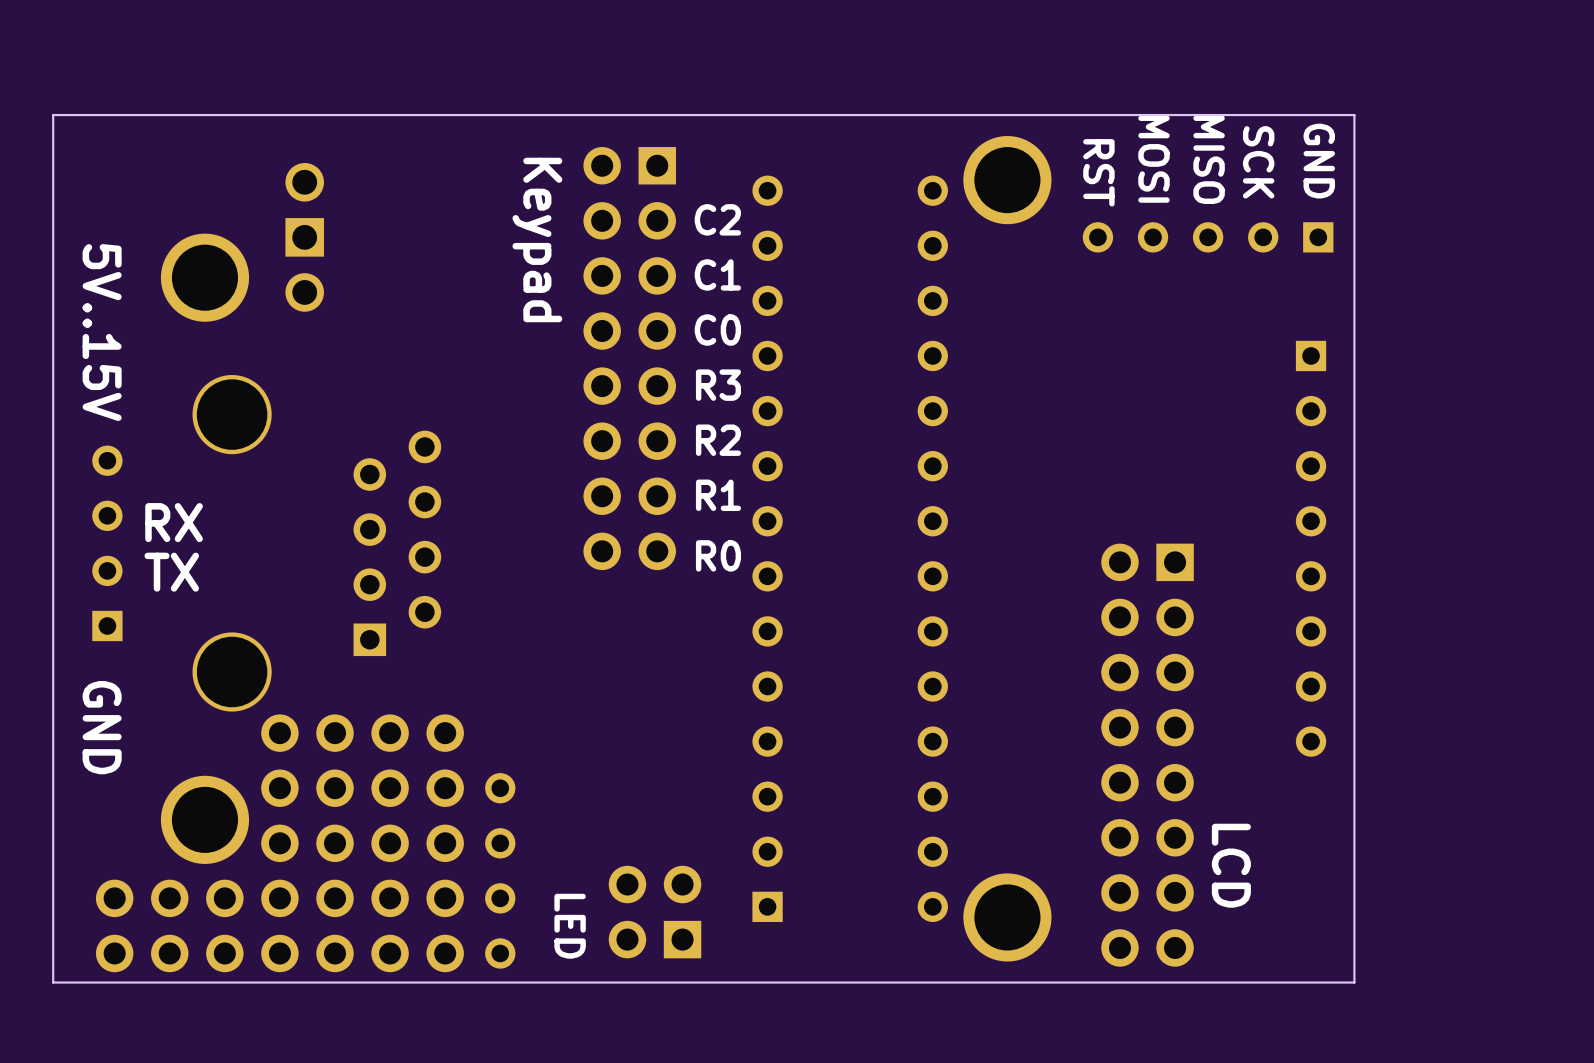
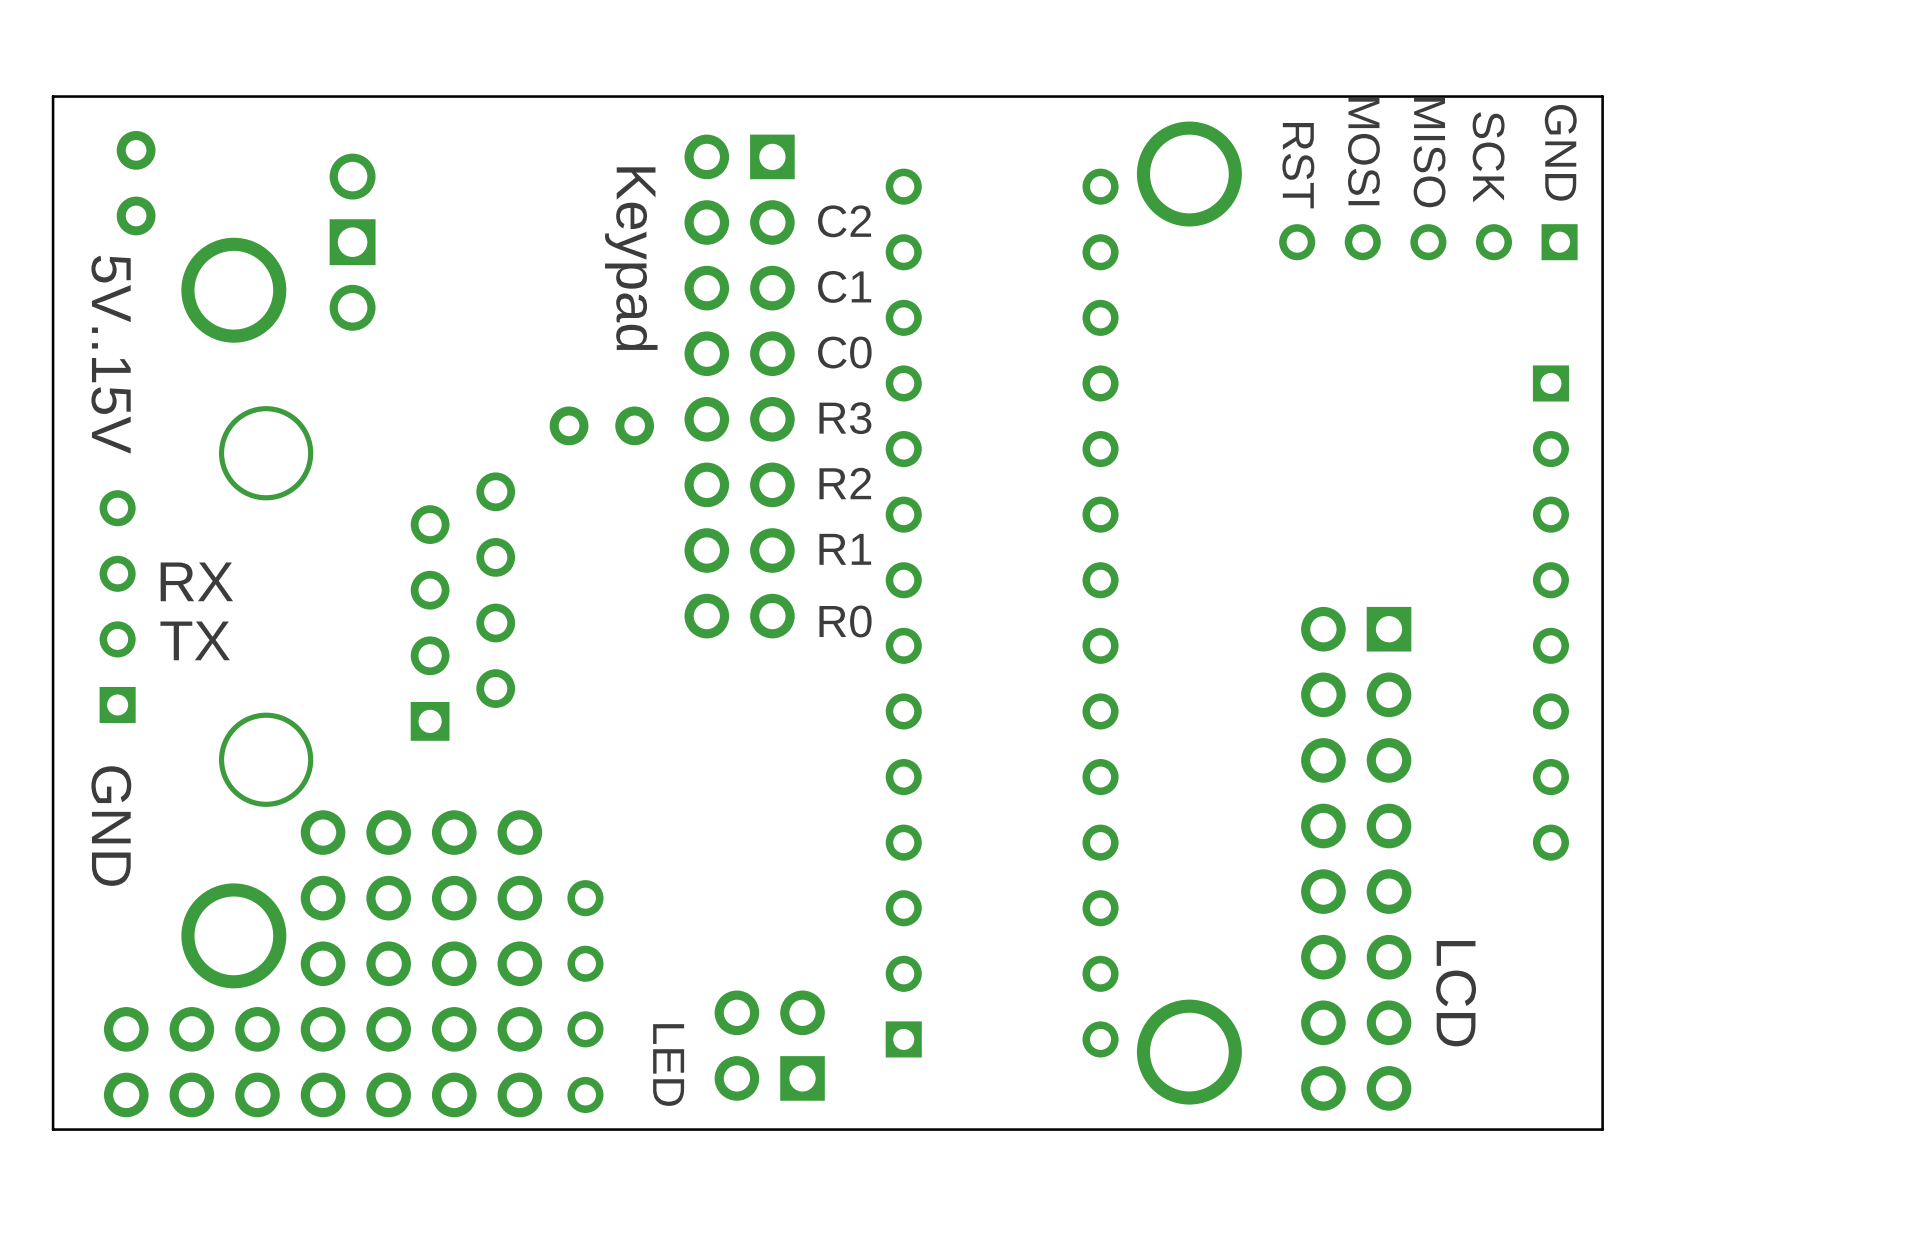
part: none -> (136, 183)
part: none -> (601, 425)

